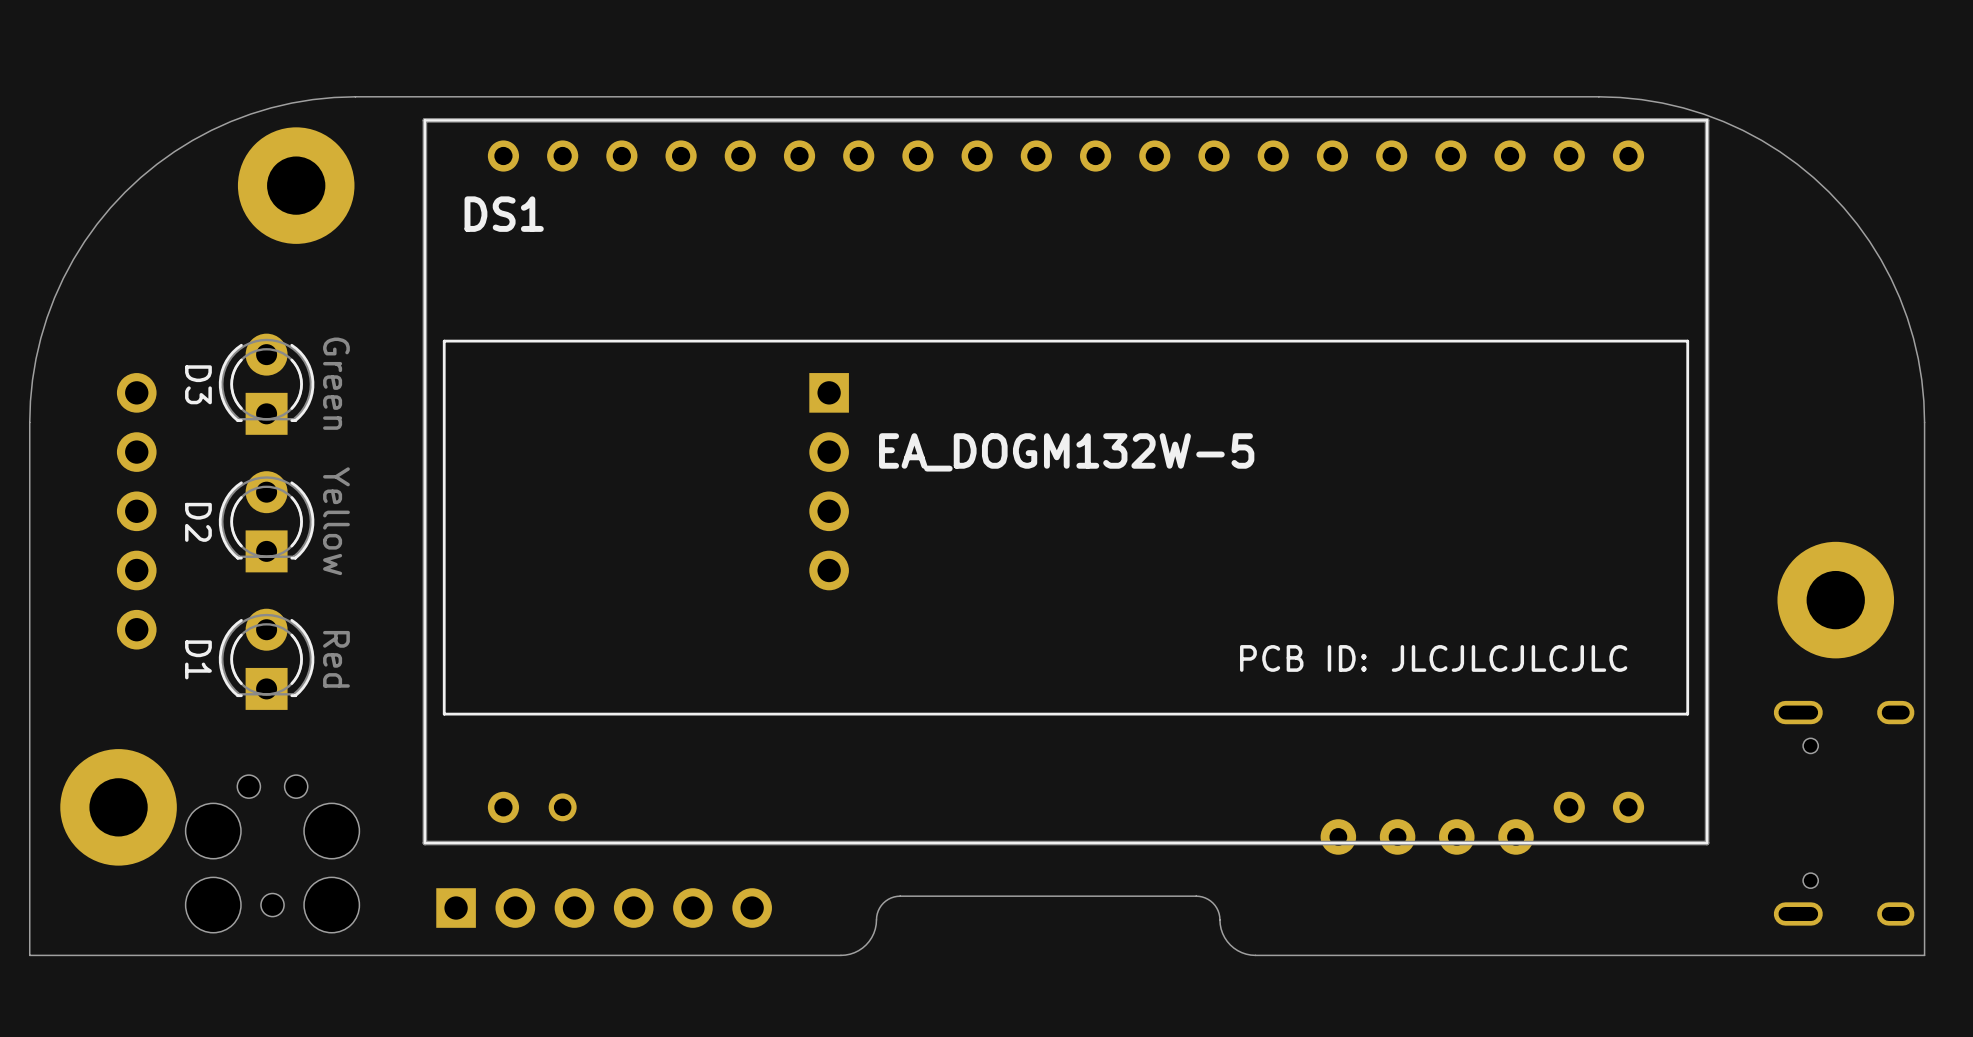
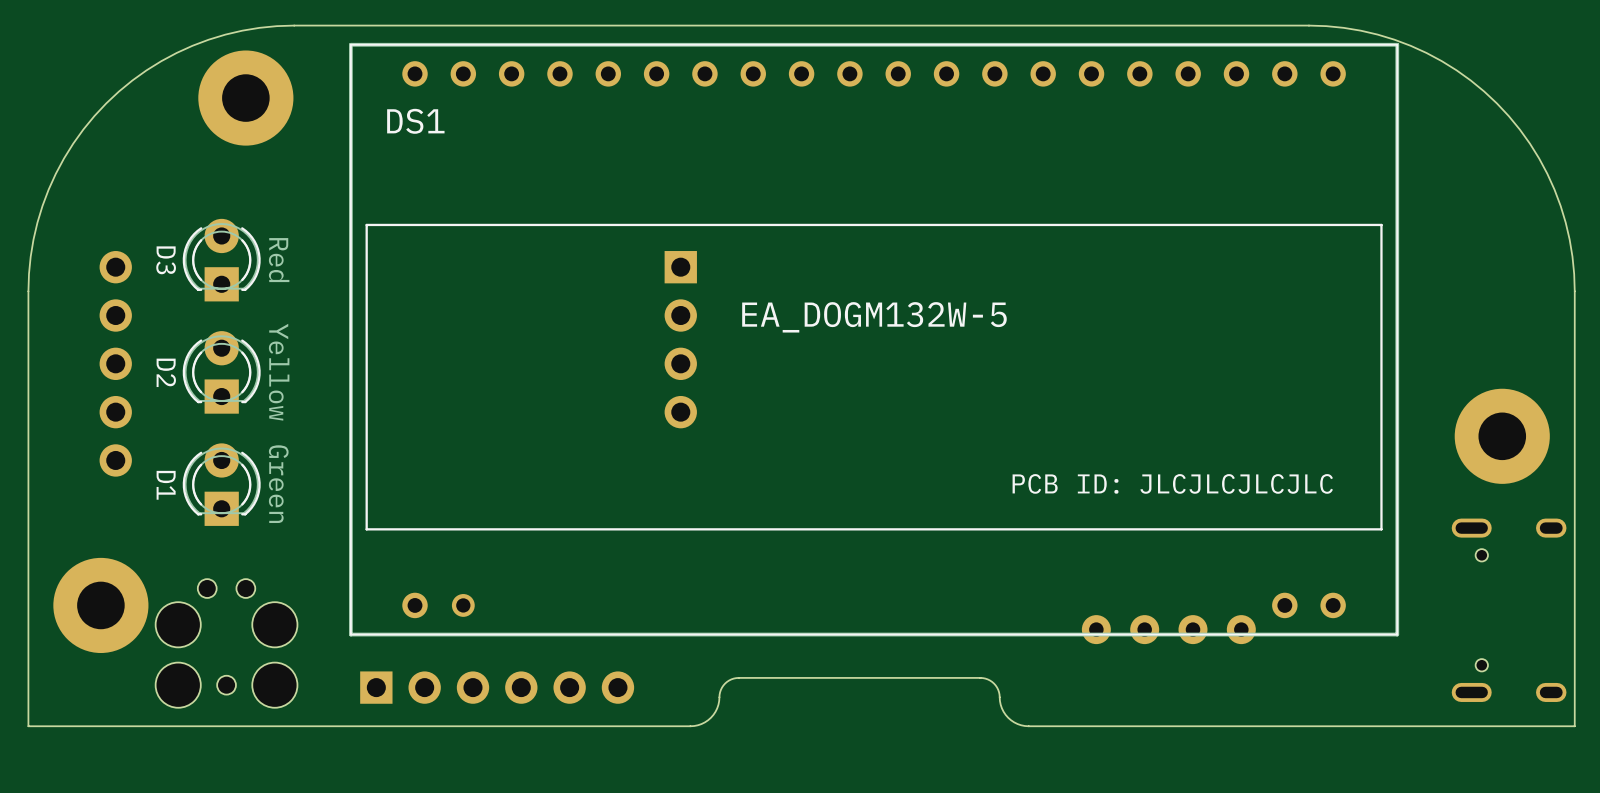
D3 value: Green (336, 383) -> Red (279, 260)
D1 value: Red (336, 659) -> Green (278, 484)

